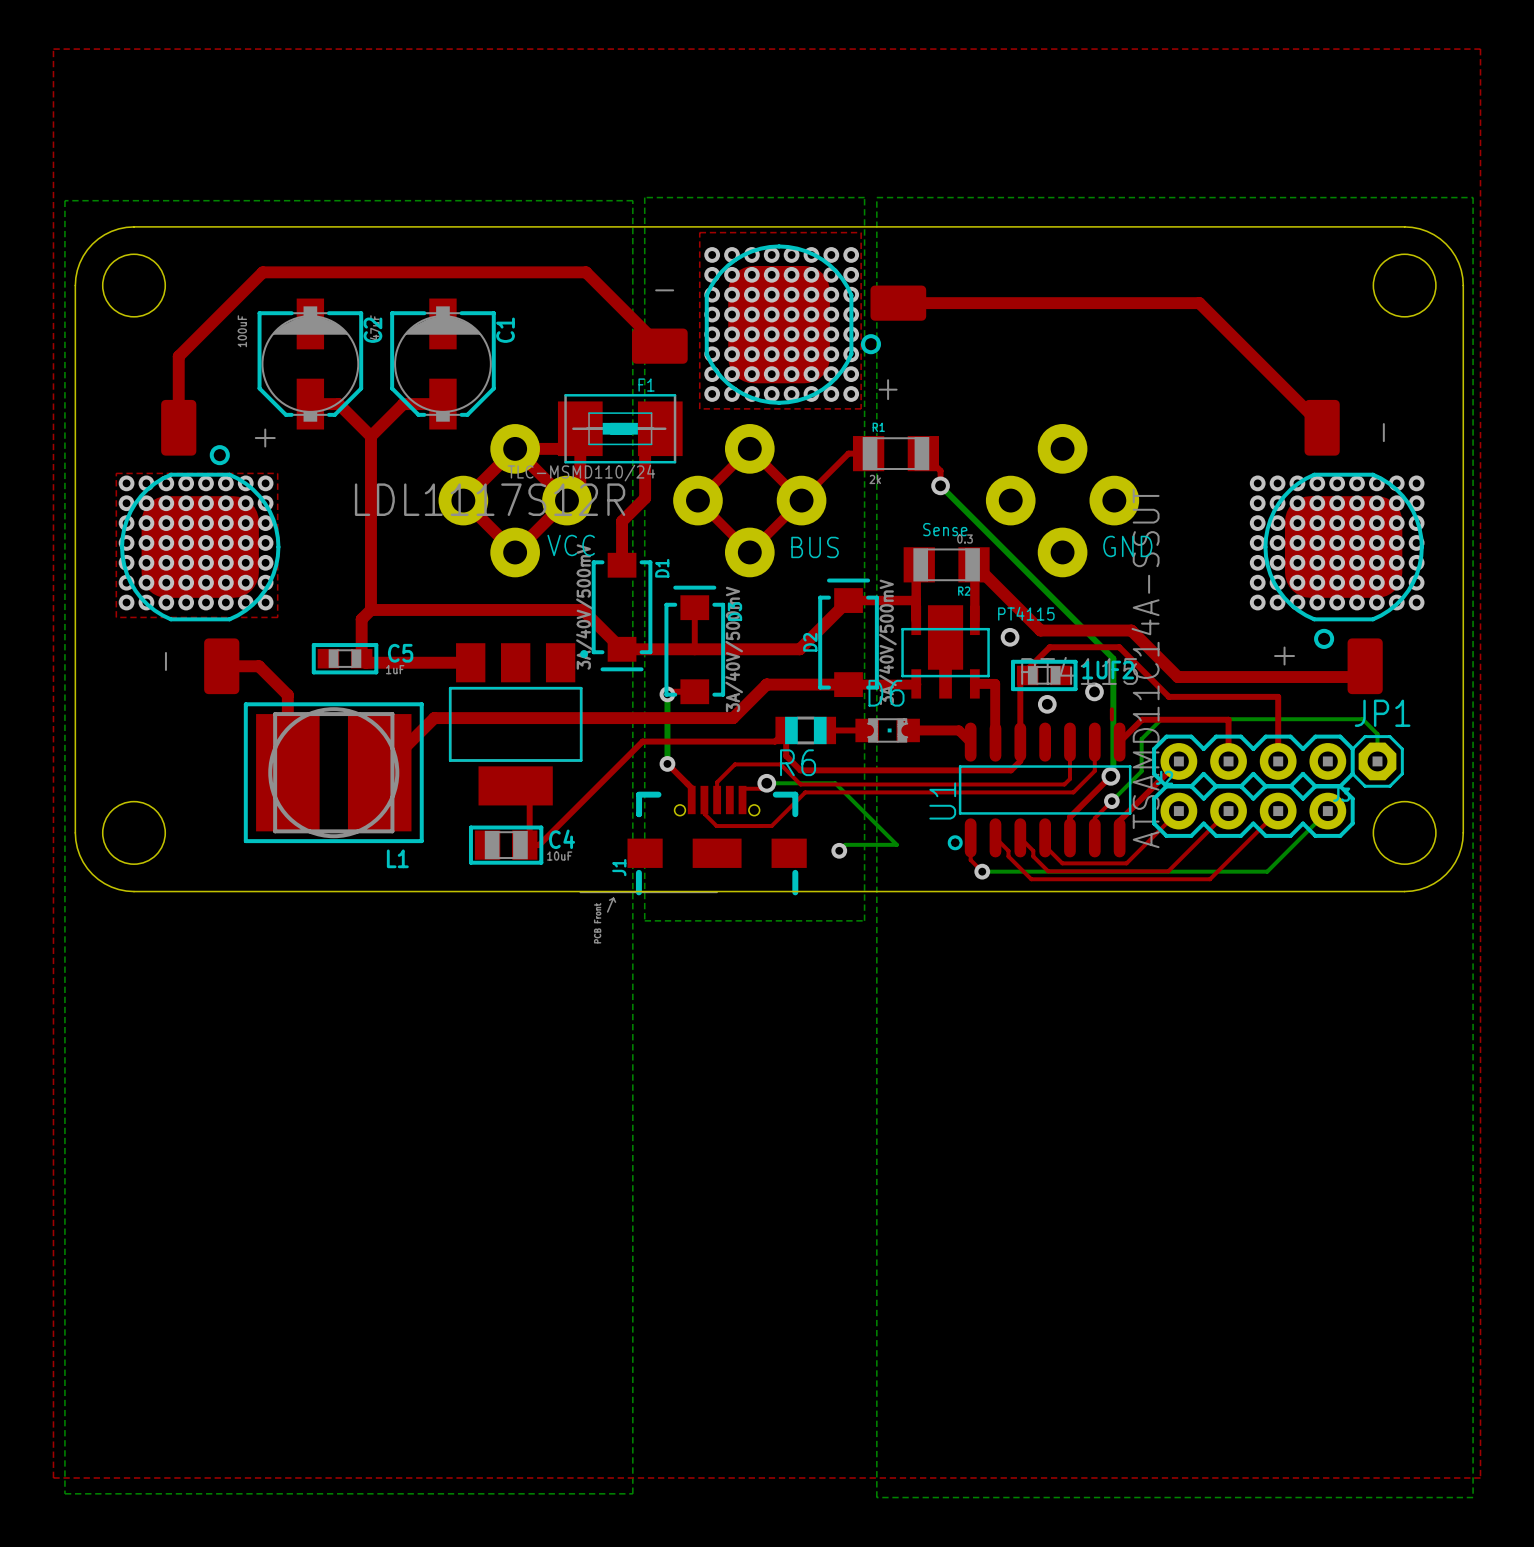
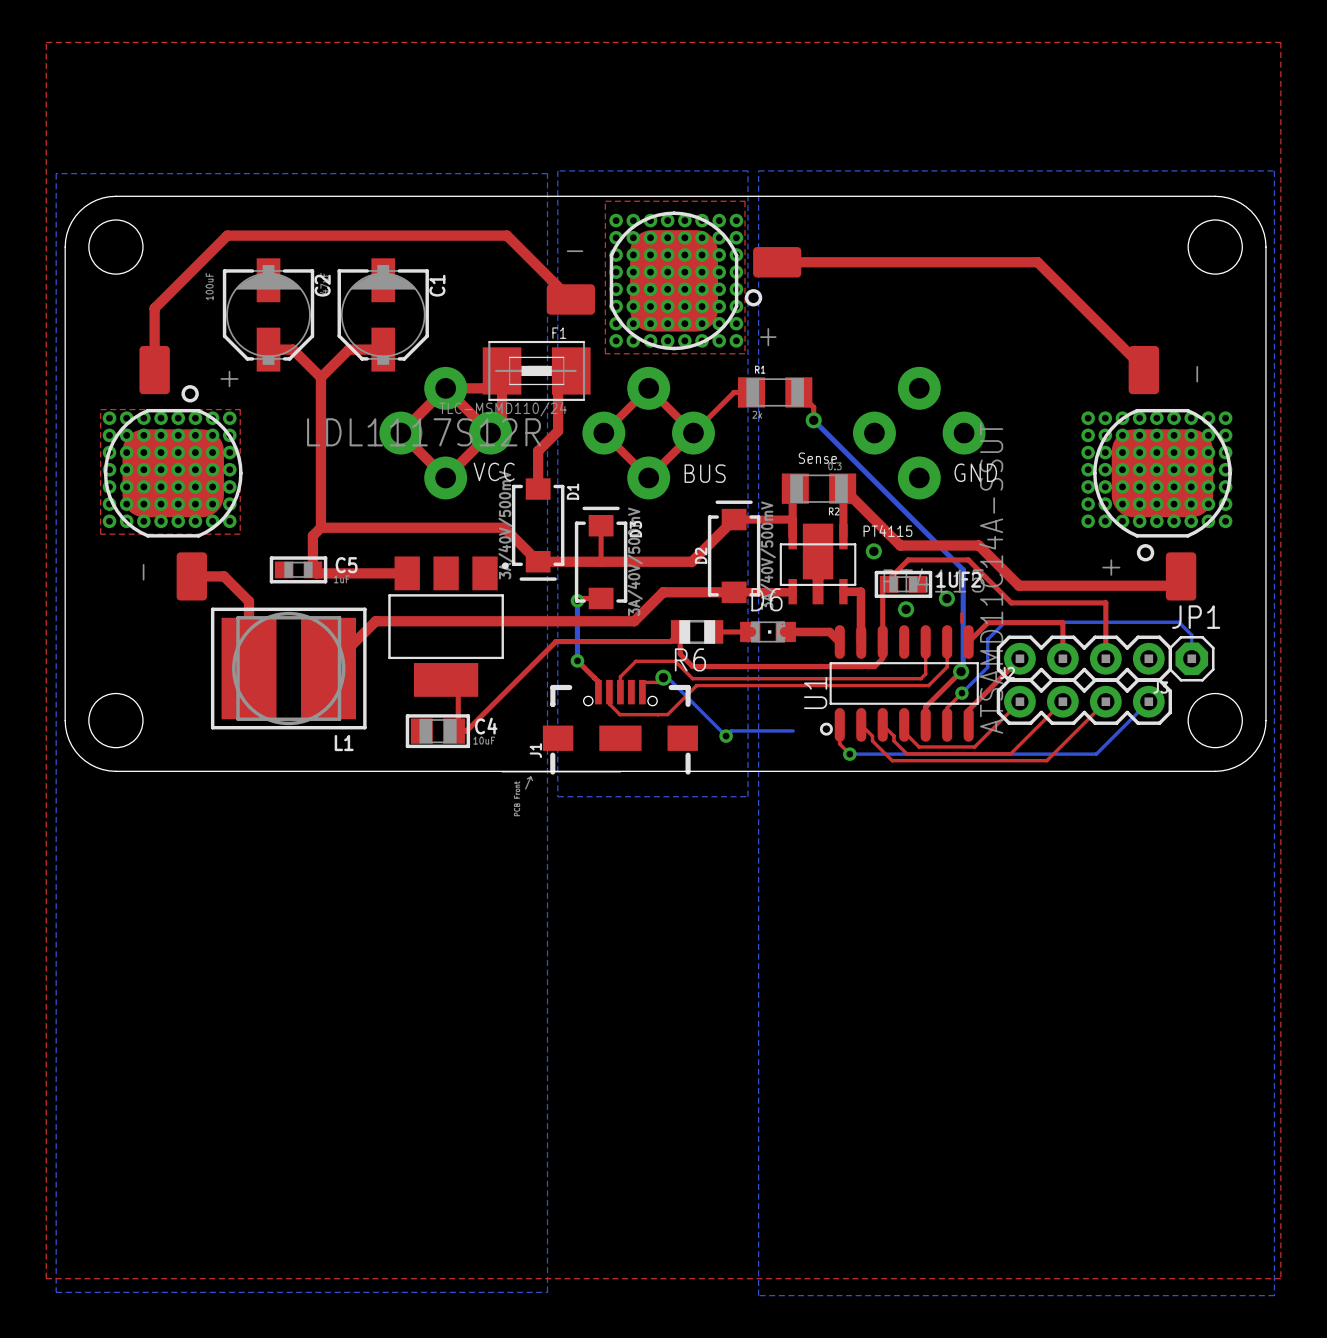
bottom track: (771, 783) (835, 783) (896, 844) -> (667, 677) (726, 736)
bottom track: none -> (775, 730) (793, 730)

